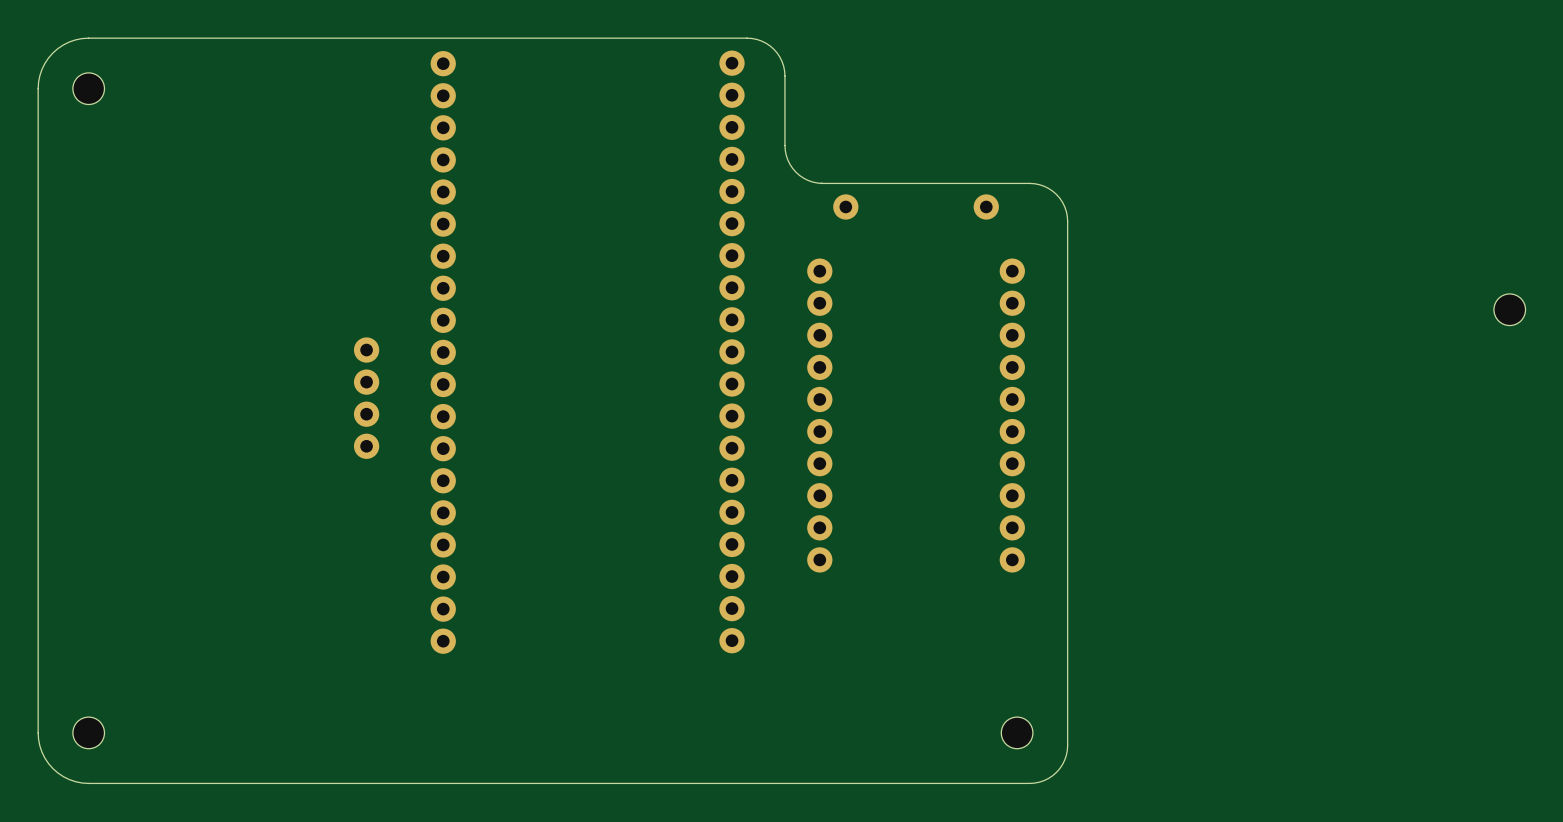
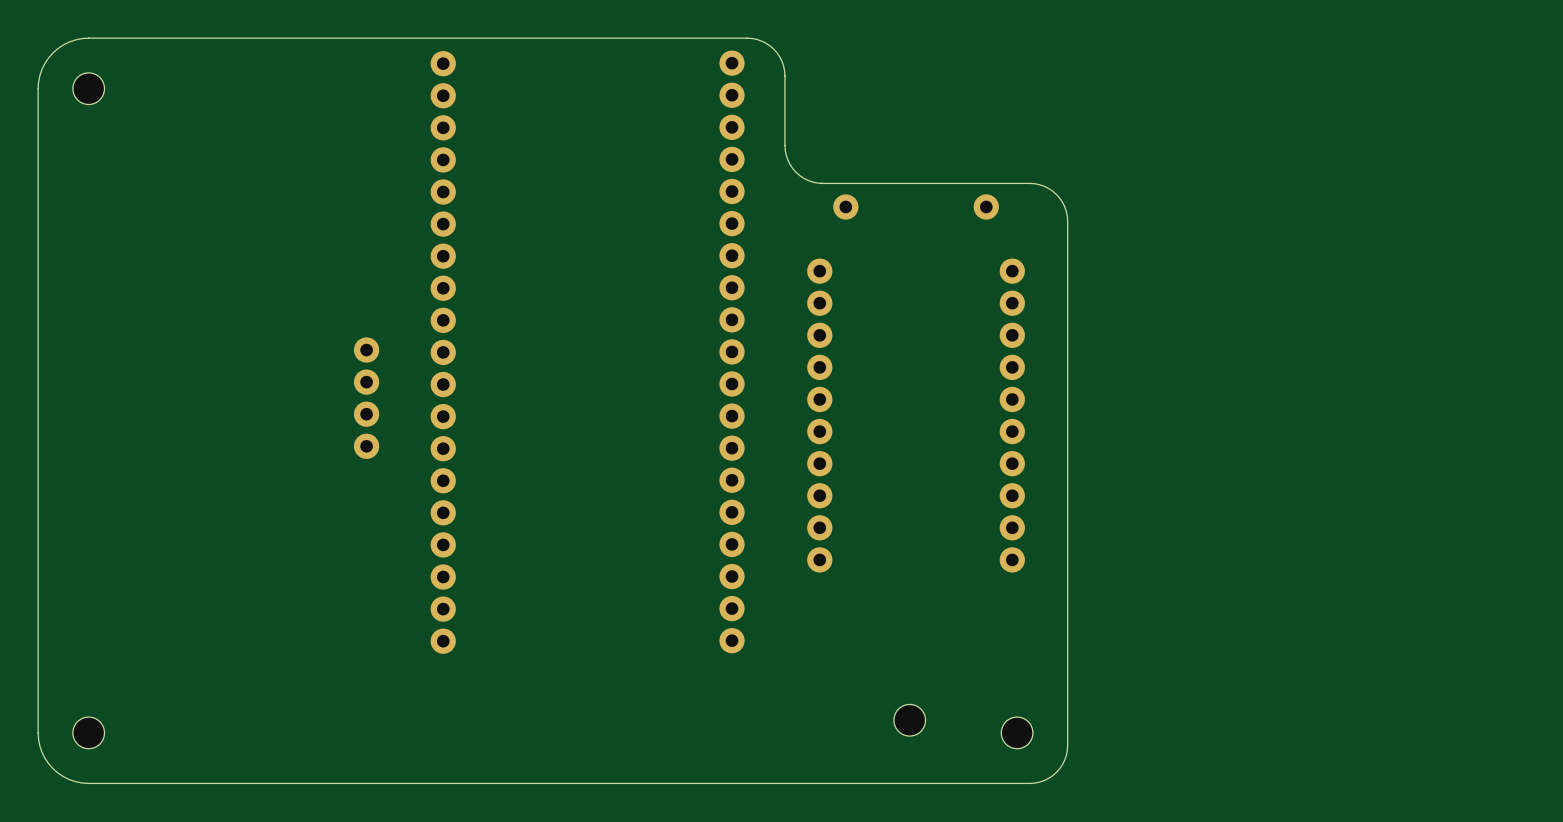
part: (1509, 309) -> none
part: none -> (909, 720)

